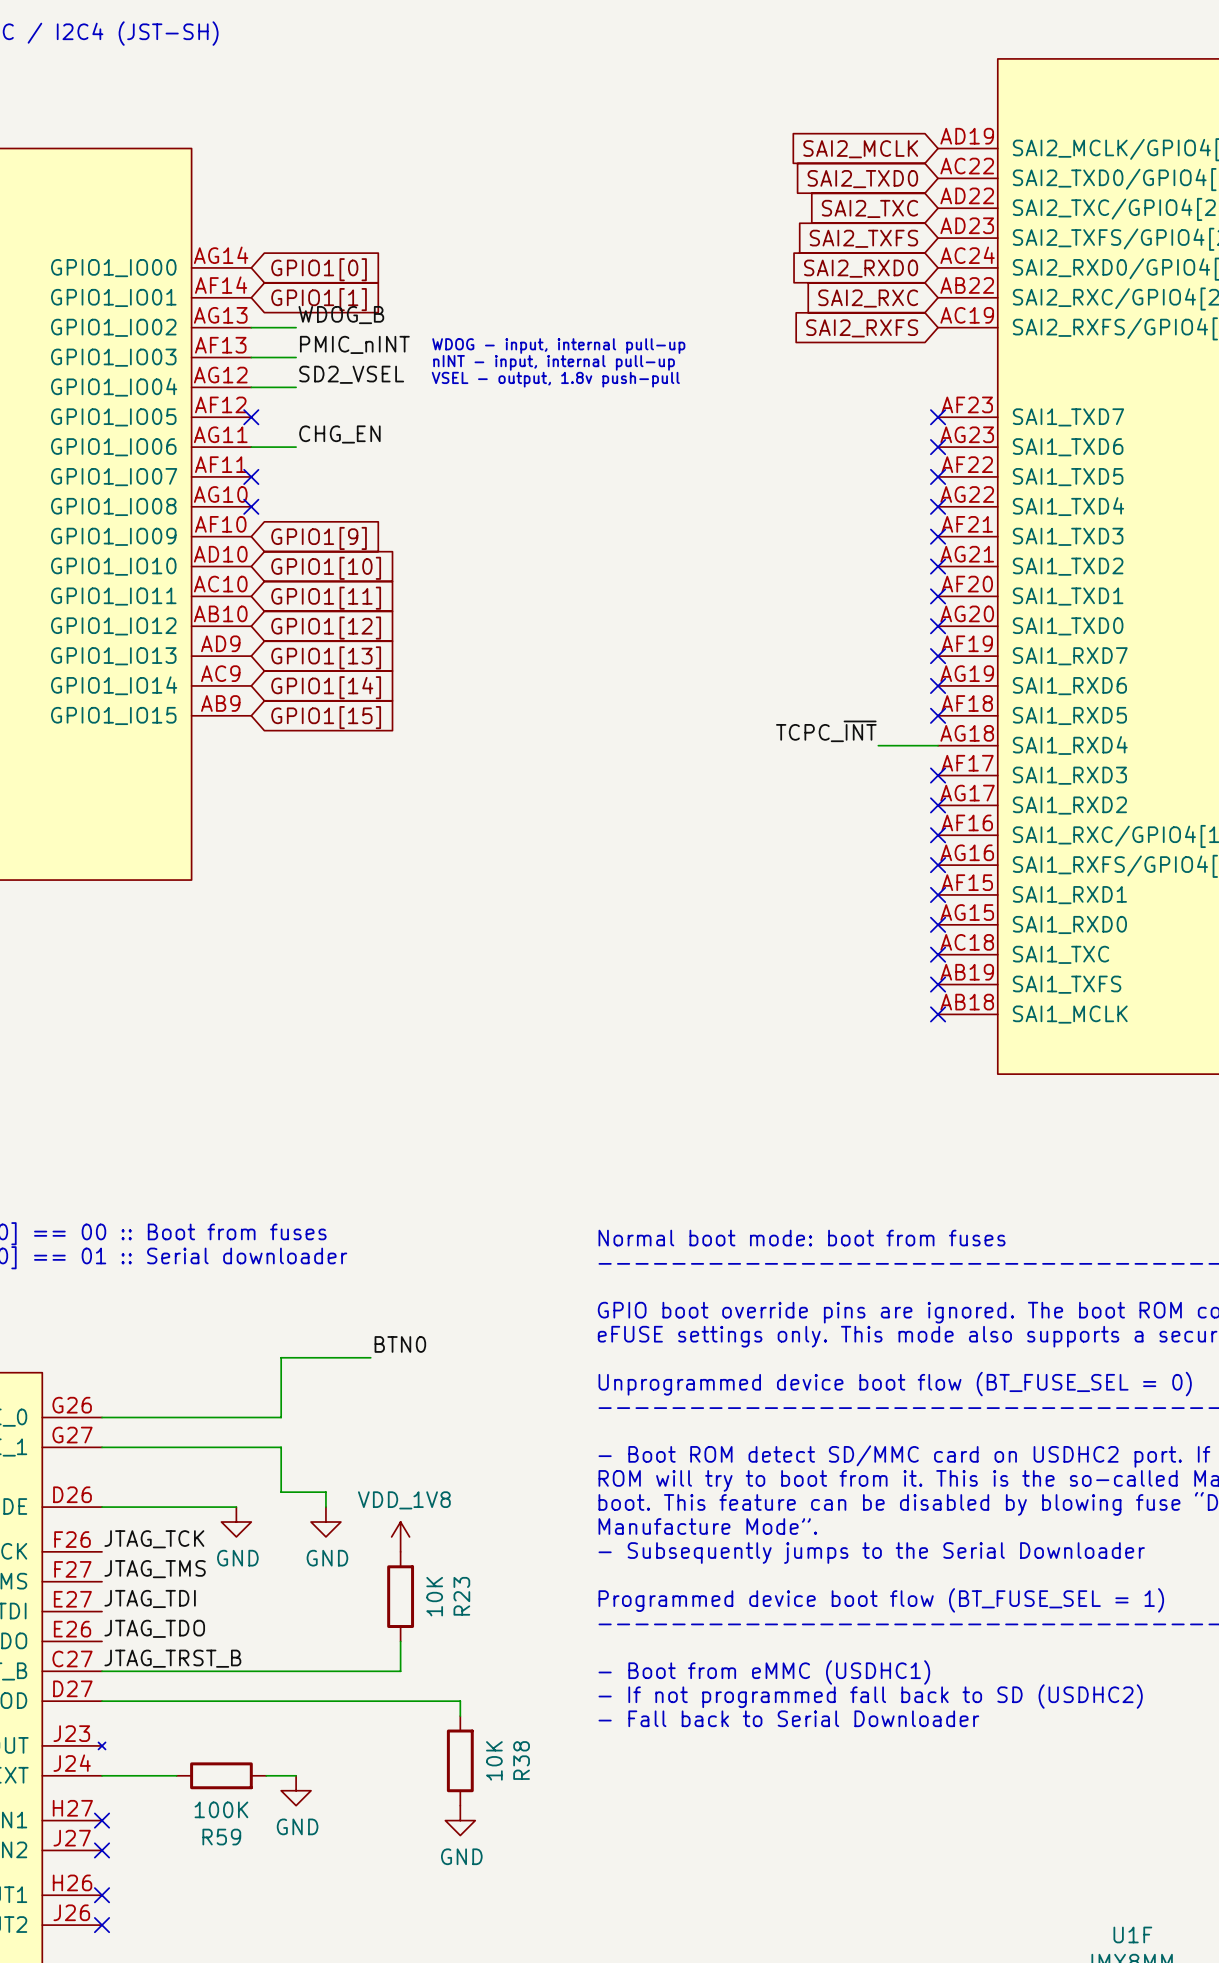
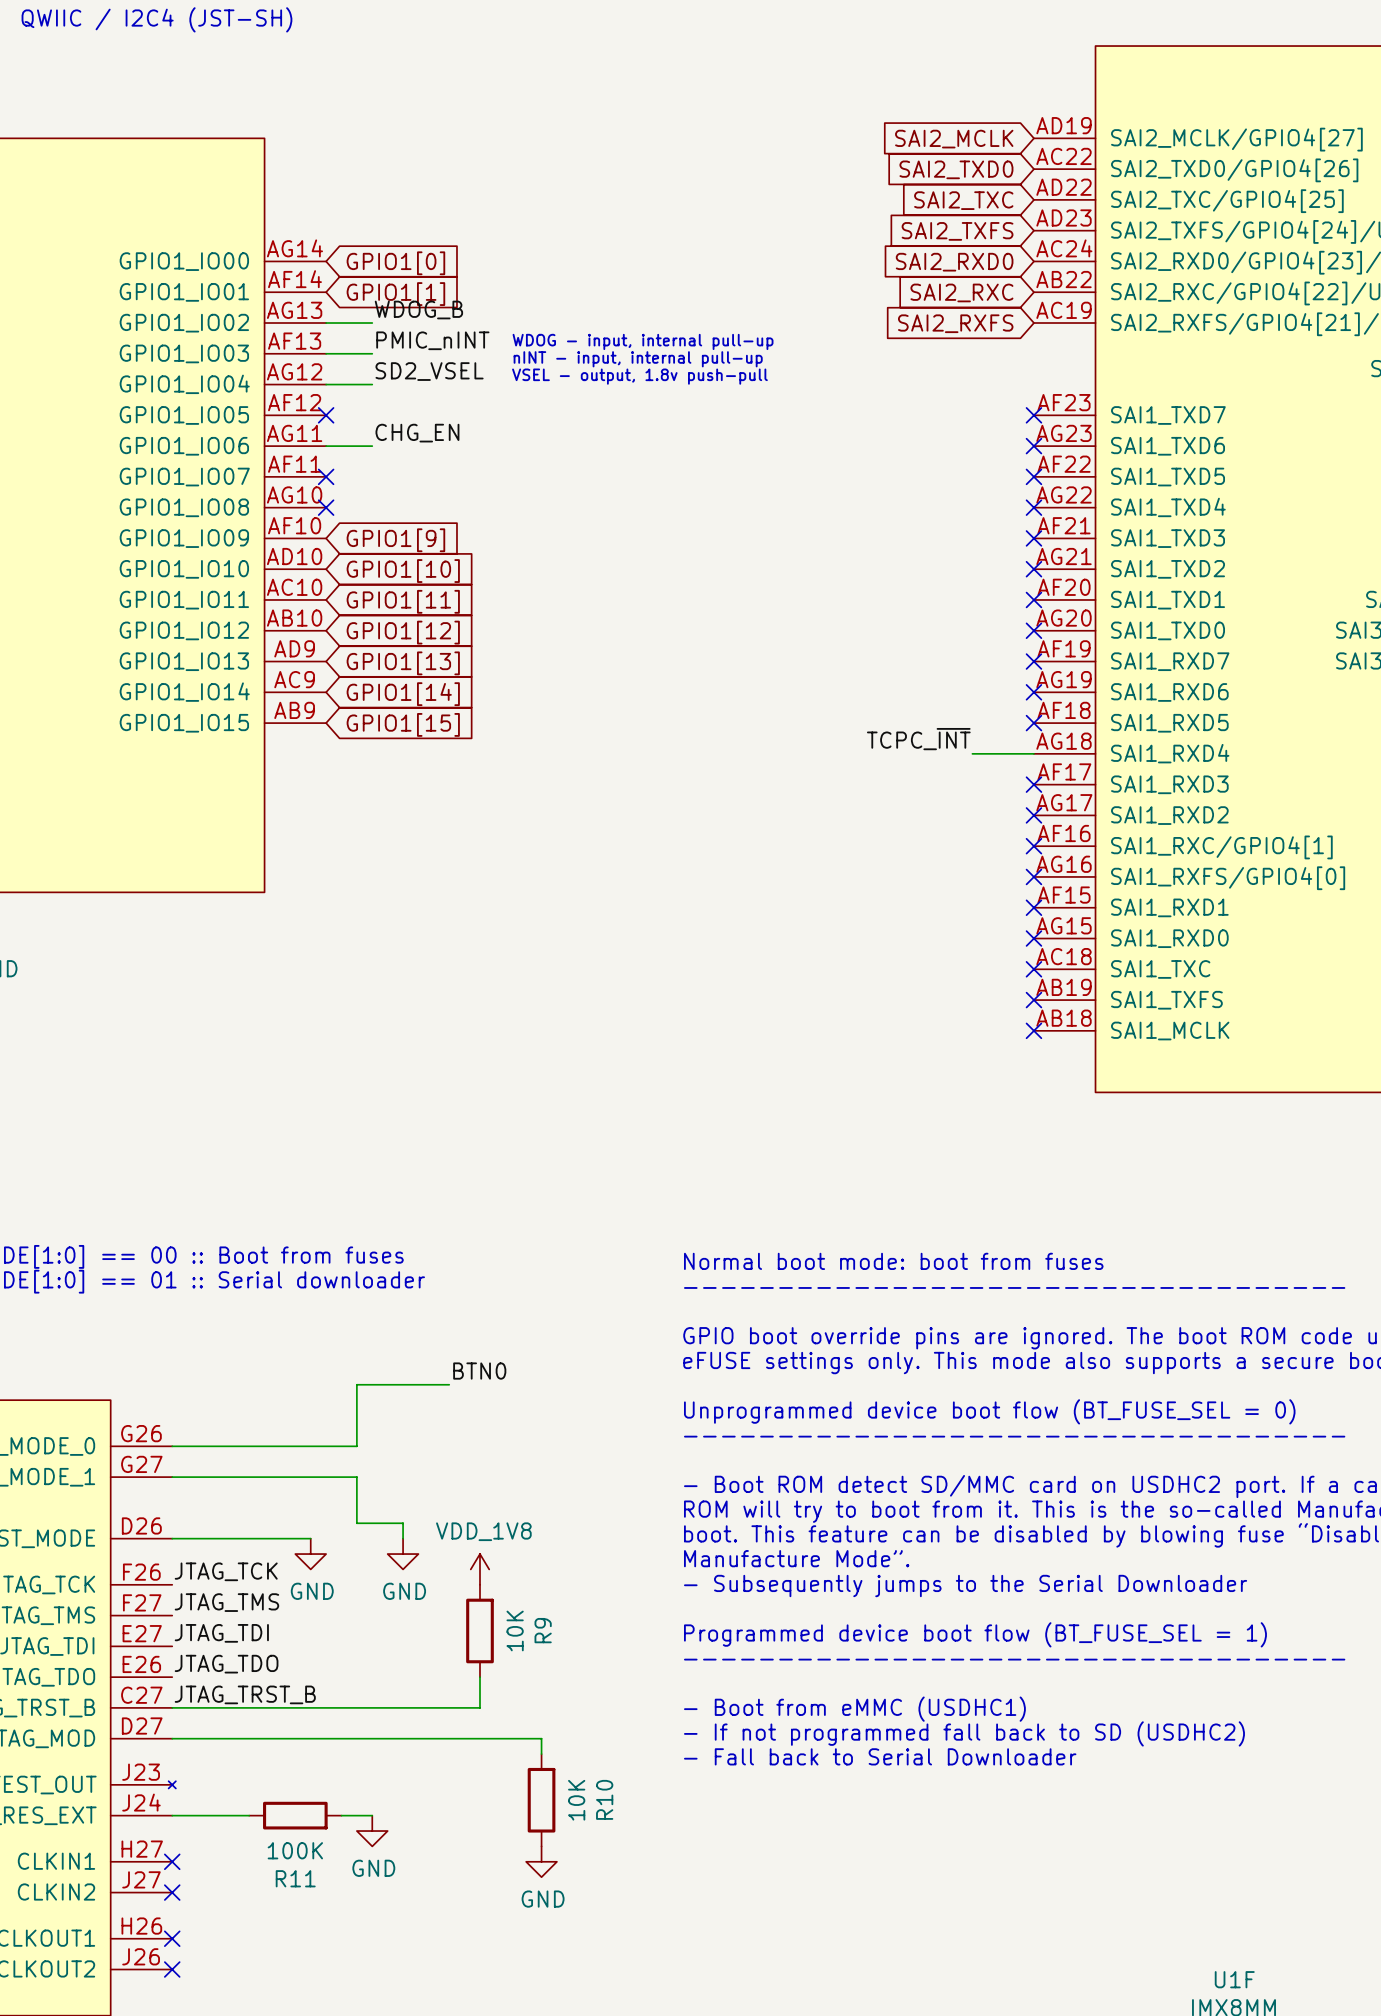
R23 name: R23 (461, 1596) -> R9 (543, 1630)
R38 name: R38 (521, 1760) -> R10 (604, 1799)
R59 name: R59 (221, 1837) -> R11 (295, 1878)

